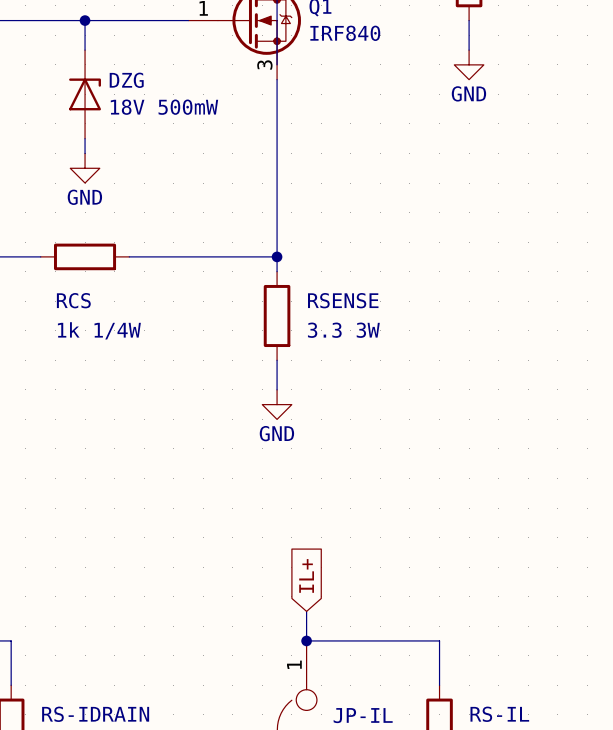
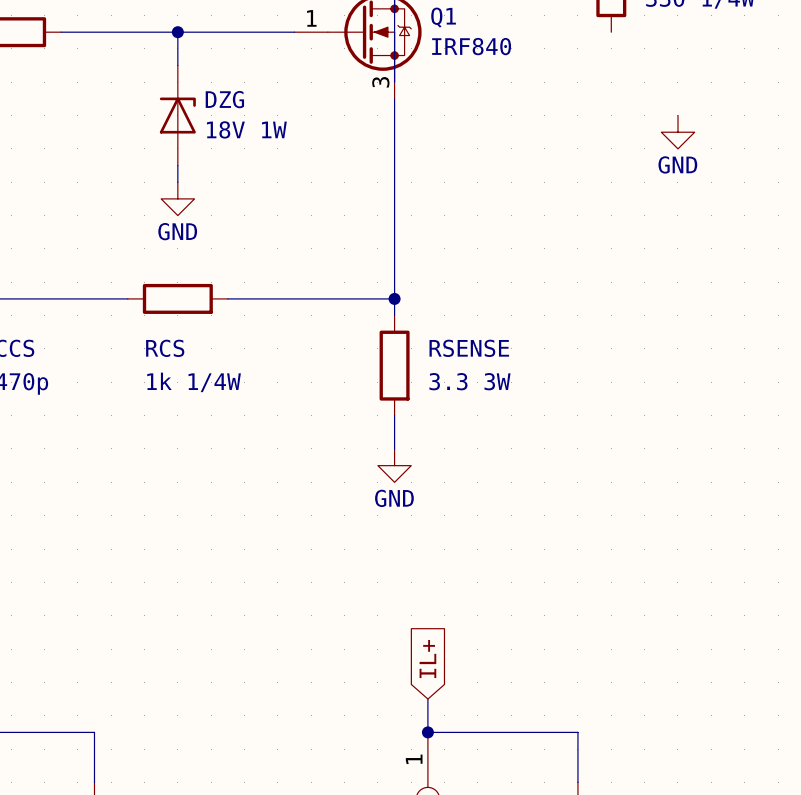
wire: (469, 20) (469, 50) -> none
power symbol position: GND (469, 64) -> GND (677, 132)
DZG value: 18V 500mW (164, 107) -> 18V 1W (246, 129)

